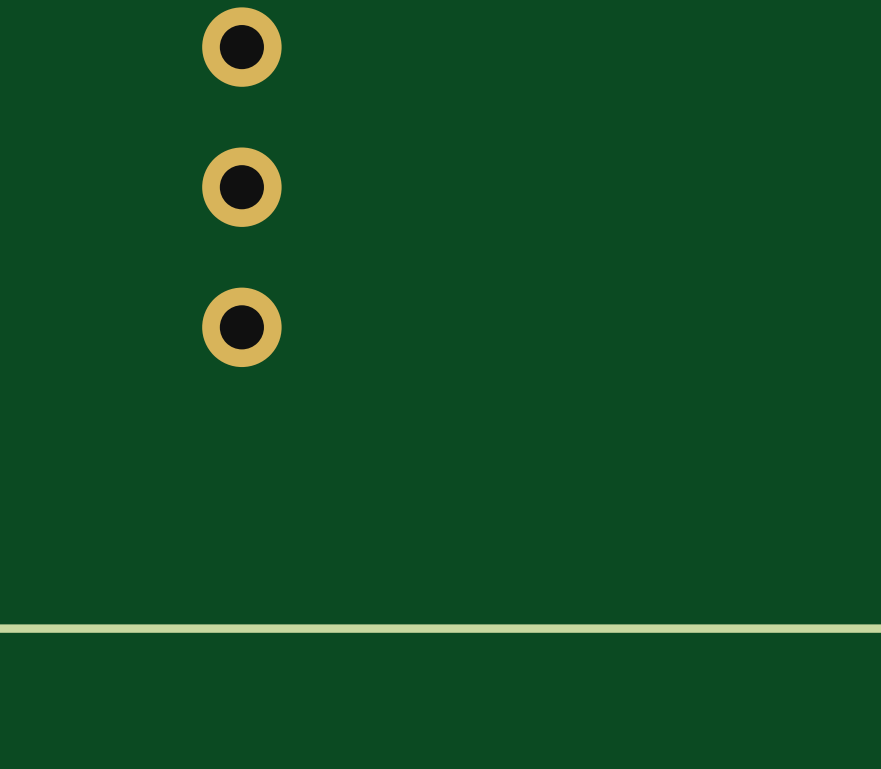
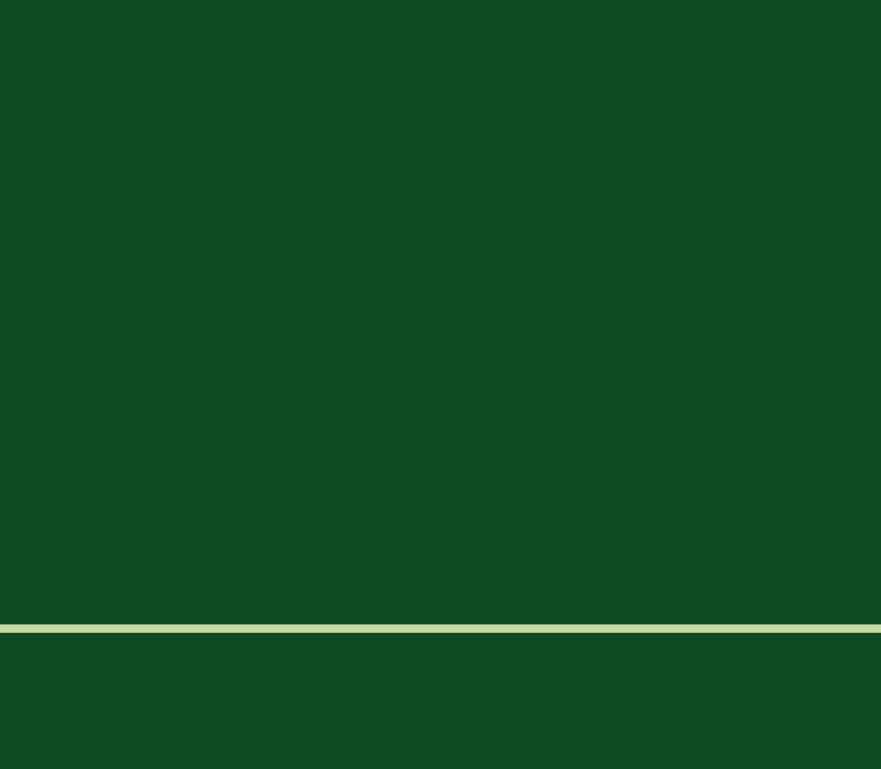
part: (241, 187) -> none

